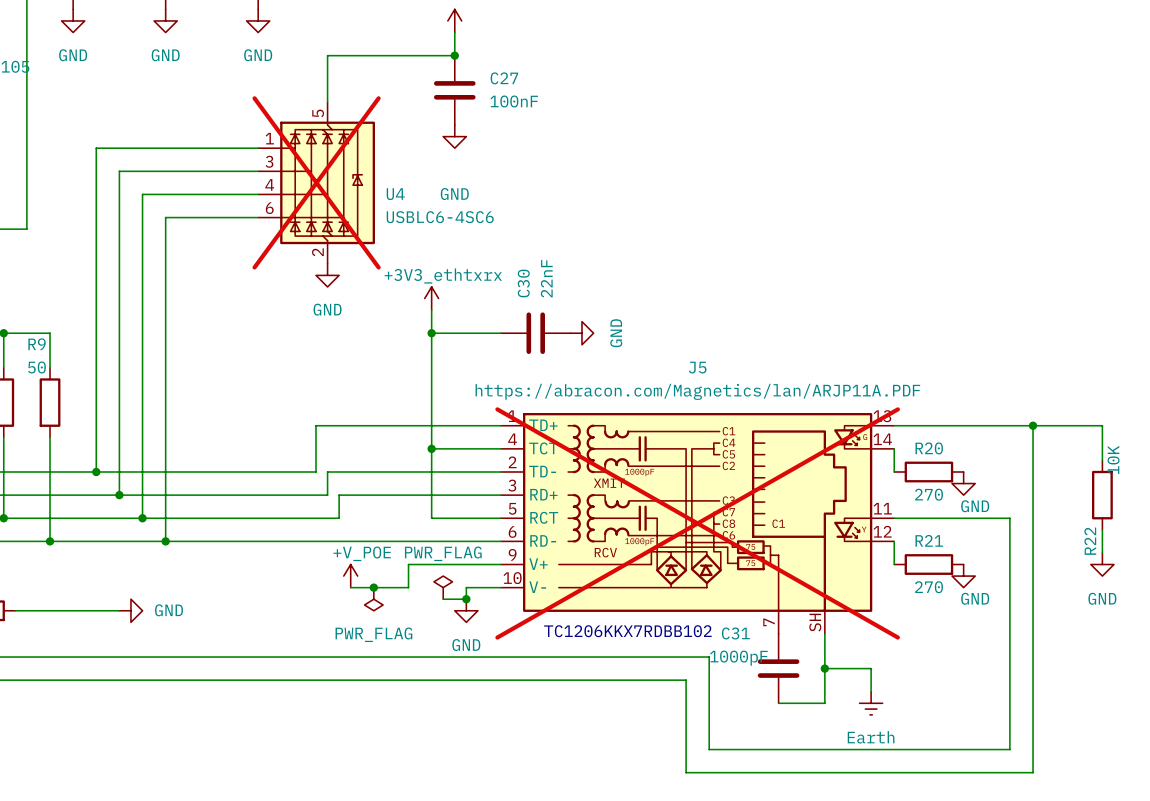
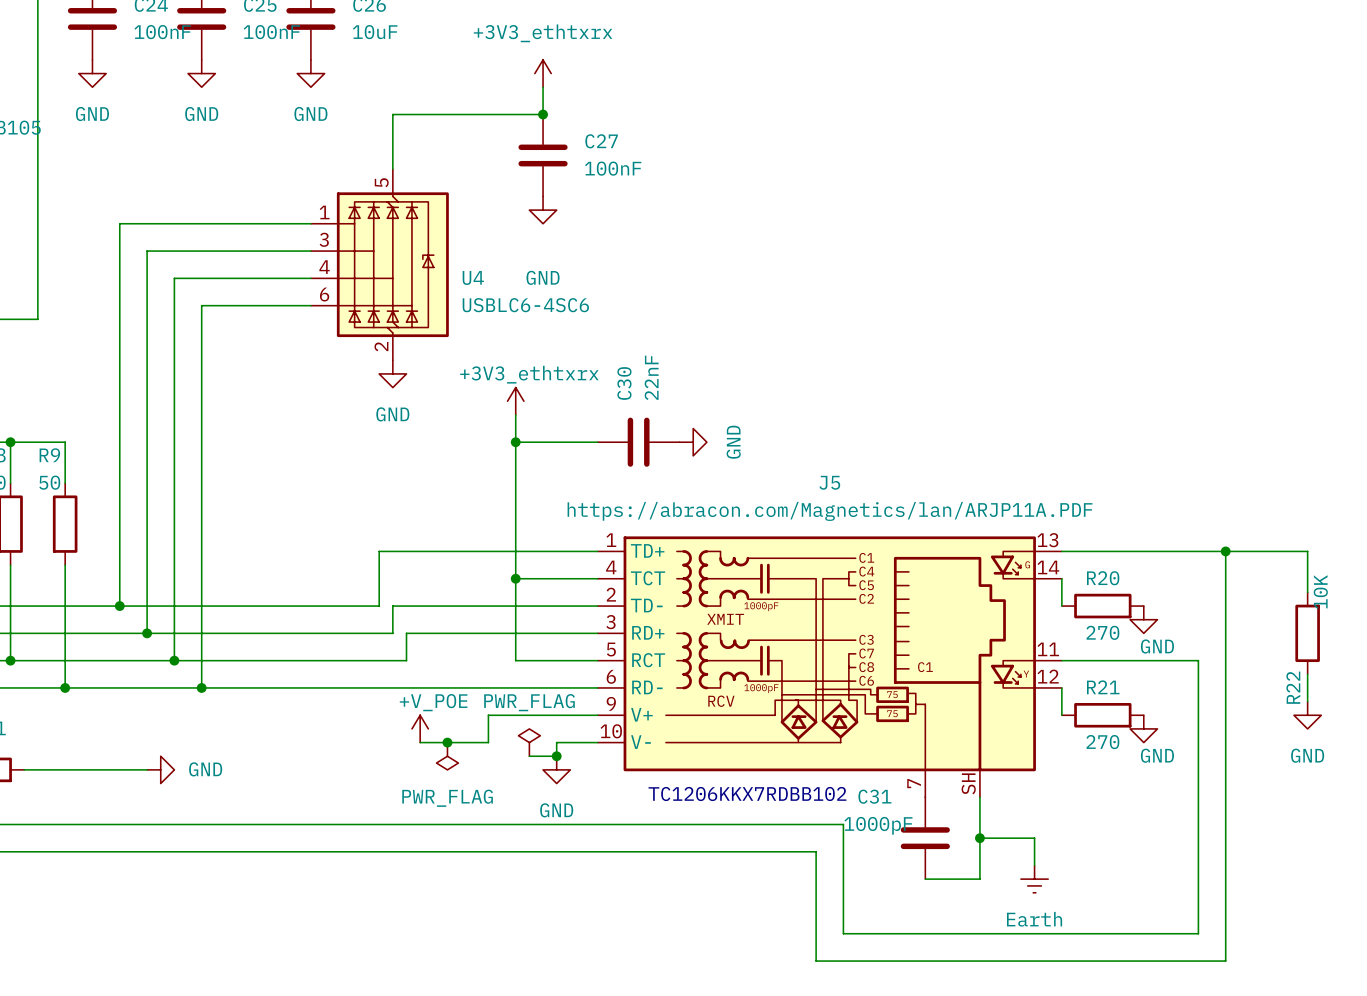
U4 do-not-place cross: (316, 182) -> none
J5 do-not-place cross: (697, 523) -> none

